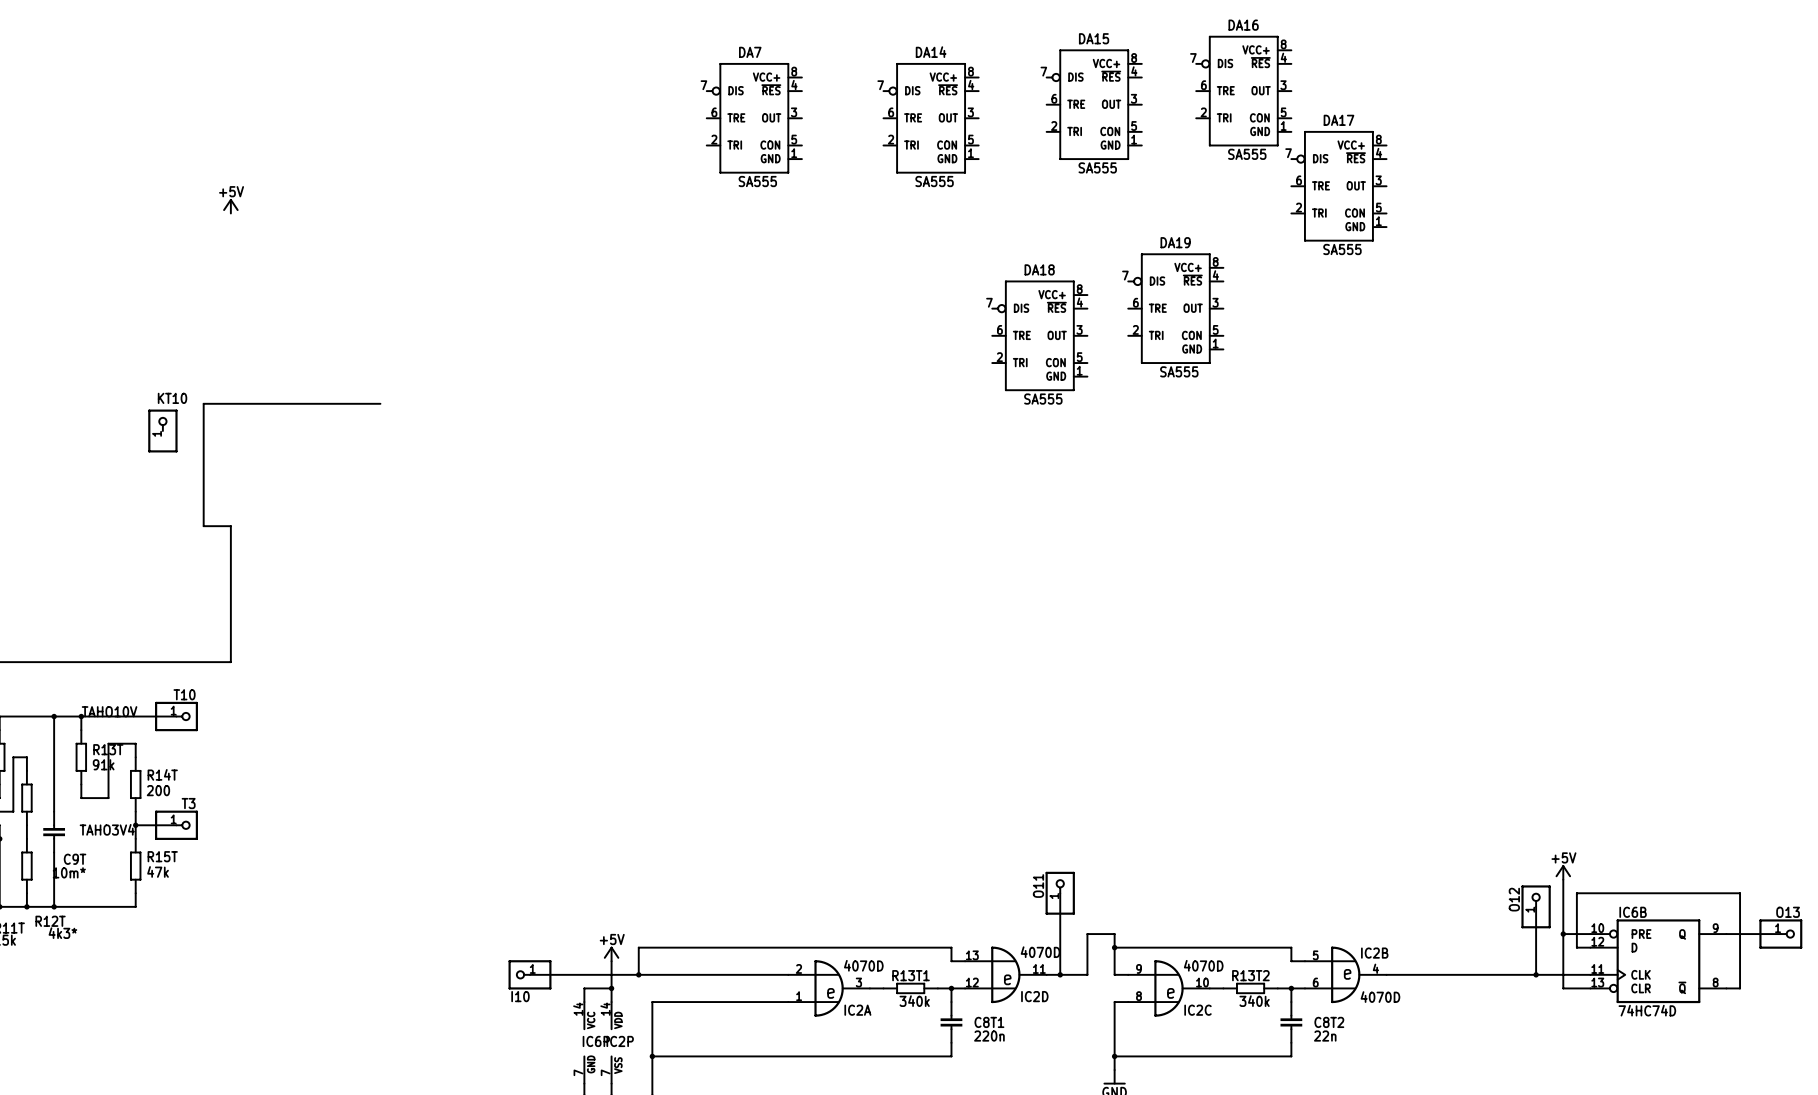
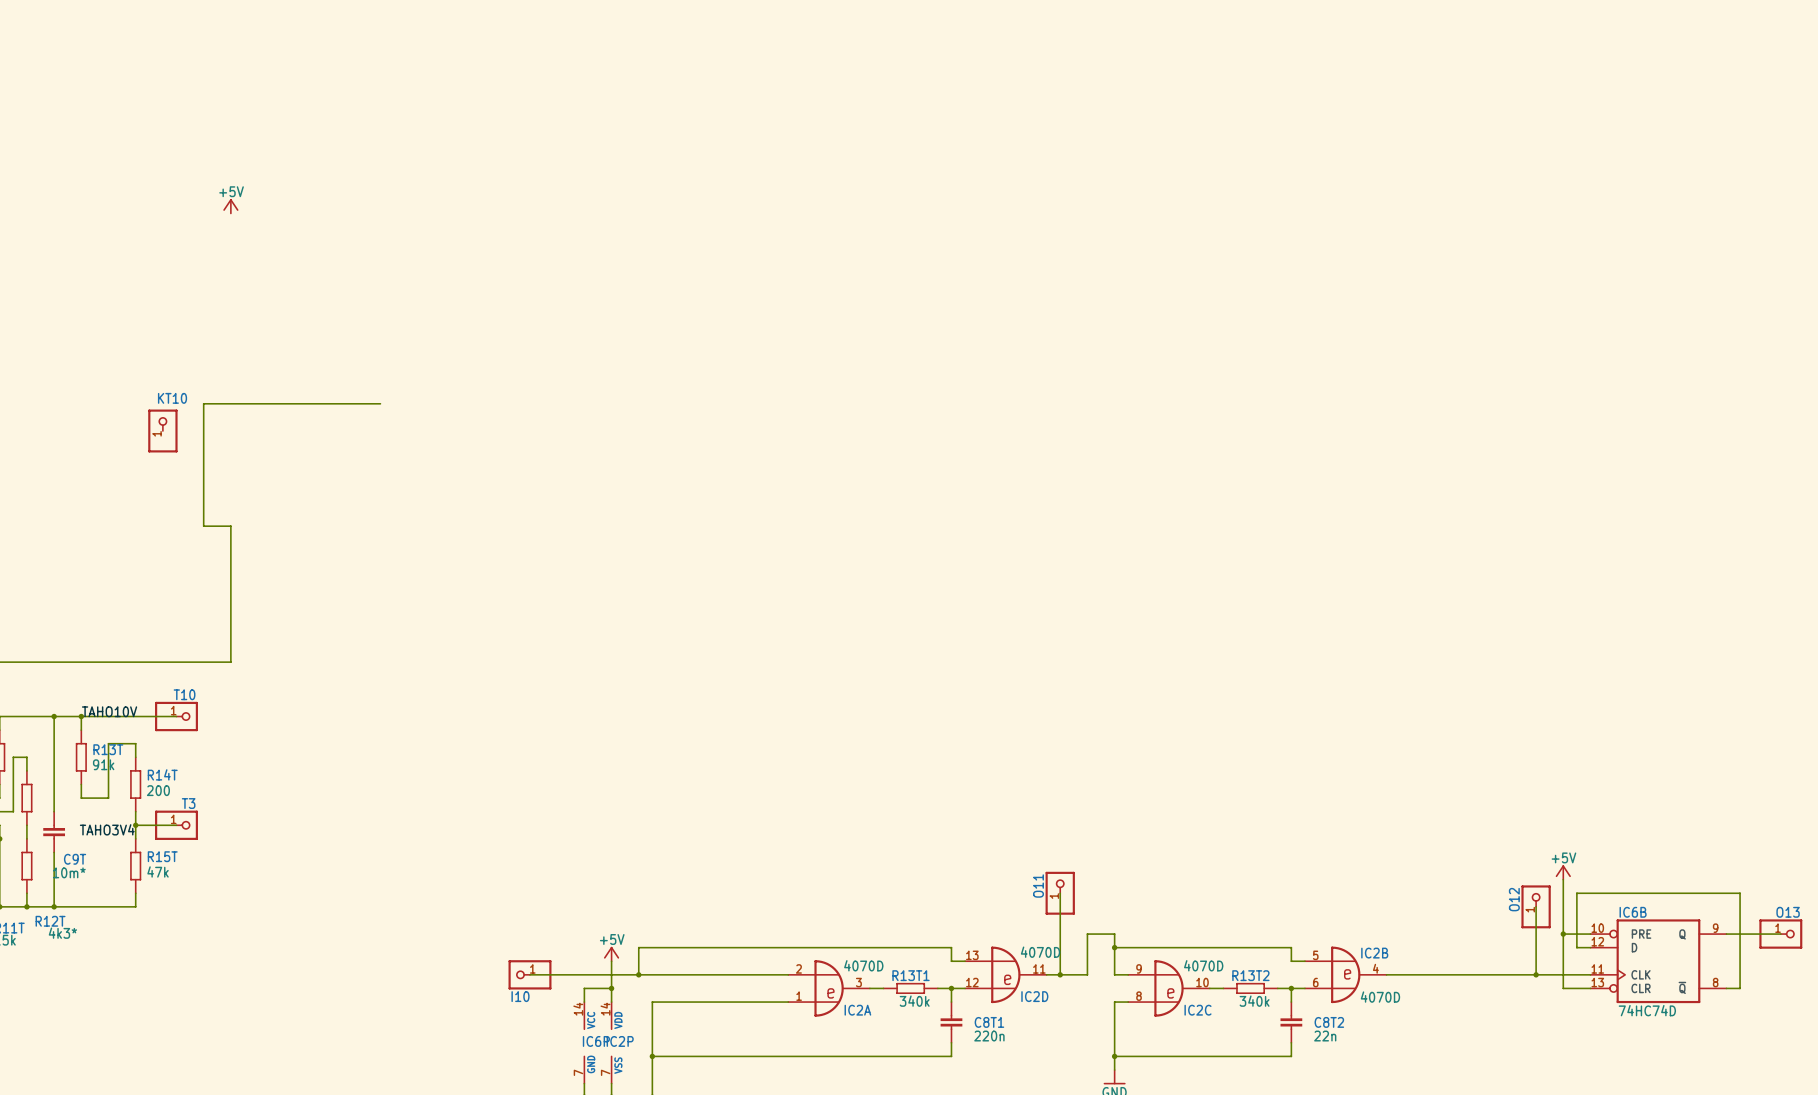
DA16: SA555 (1243, 91) -> none
DA15: SA555 (1094, 104) -> none
DA7: SA555 (754, 118) -> none
DA14: SA555 (931, 118) -> none
DA17: SA555 (1338, 186) -> none
DA19: SA555 (1175, 308) -> none
DA18: SA555 (1039, 335) -> none

